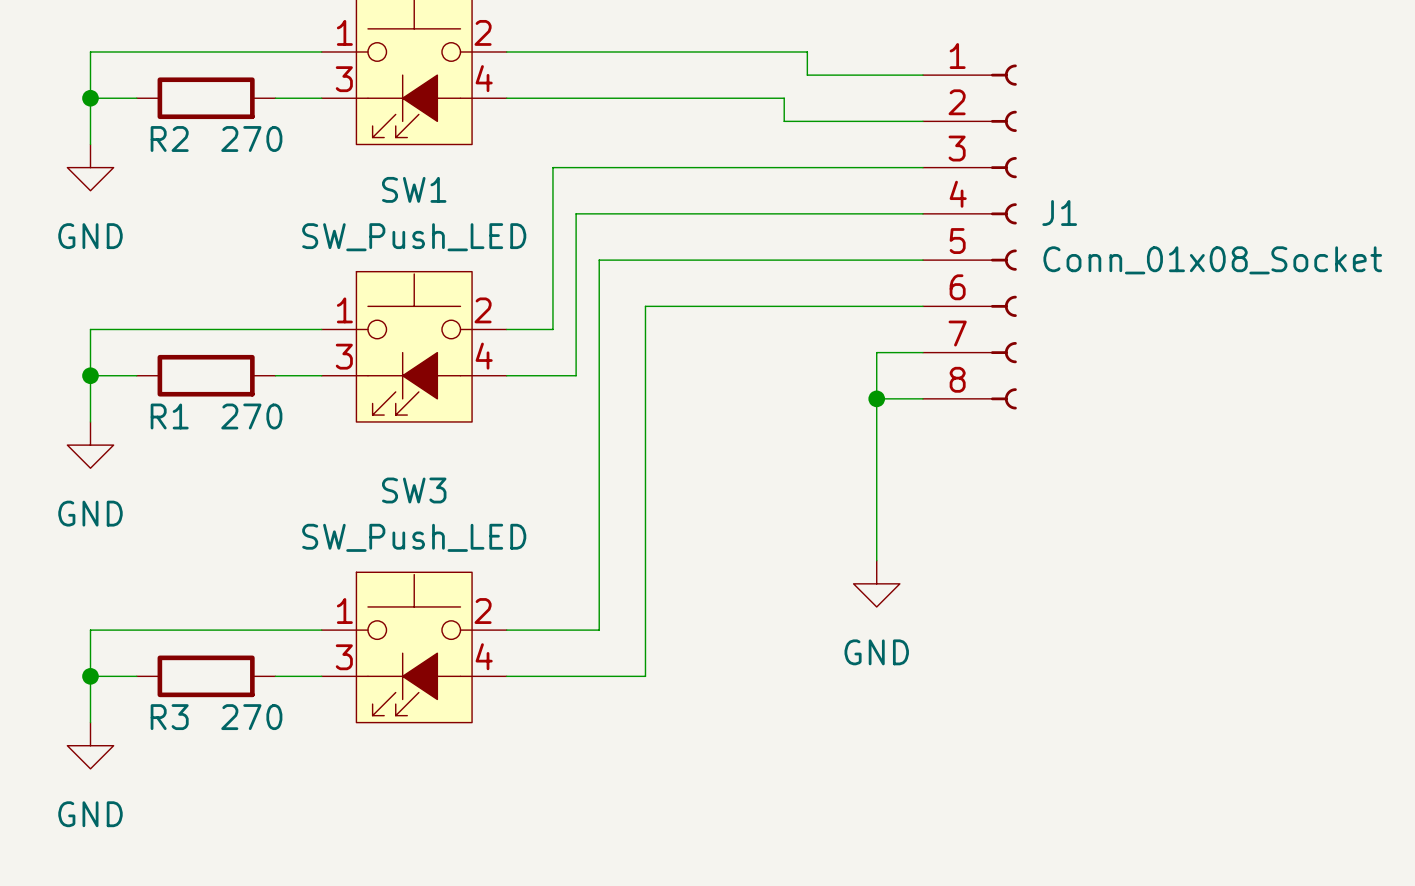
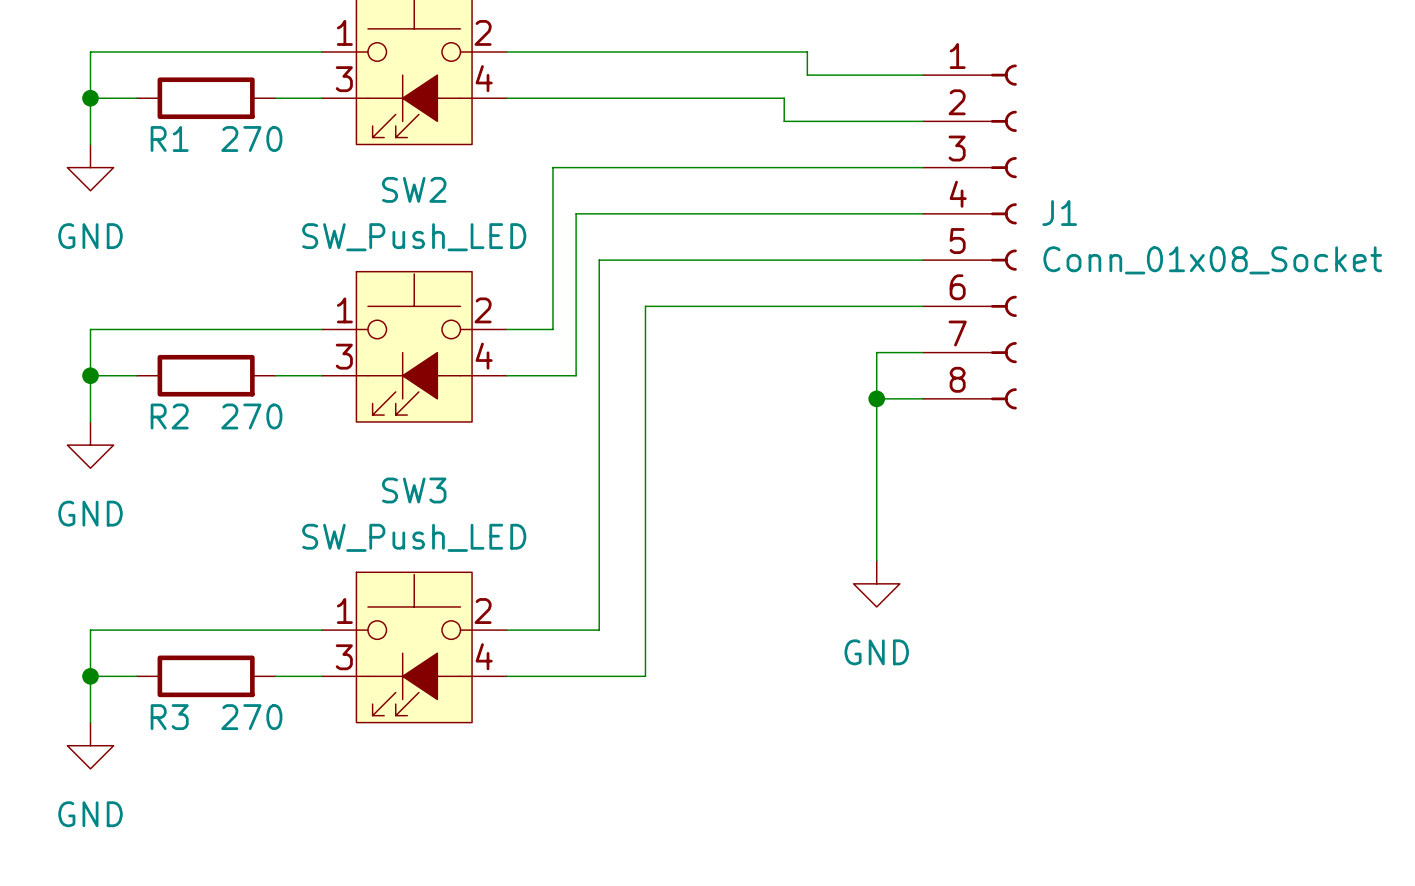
R2 name: R2 (169, 139) -> R1 (169, 139)
SW1 name: SW1 (414, 189) -> SW2 (414, 189)
R1 name: R1 (169, 416) -> R2 (169, 416)

